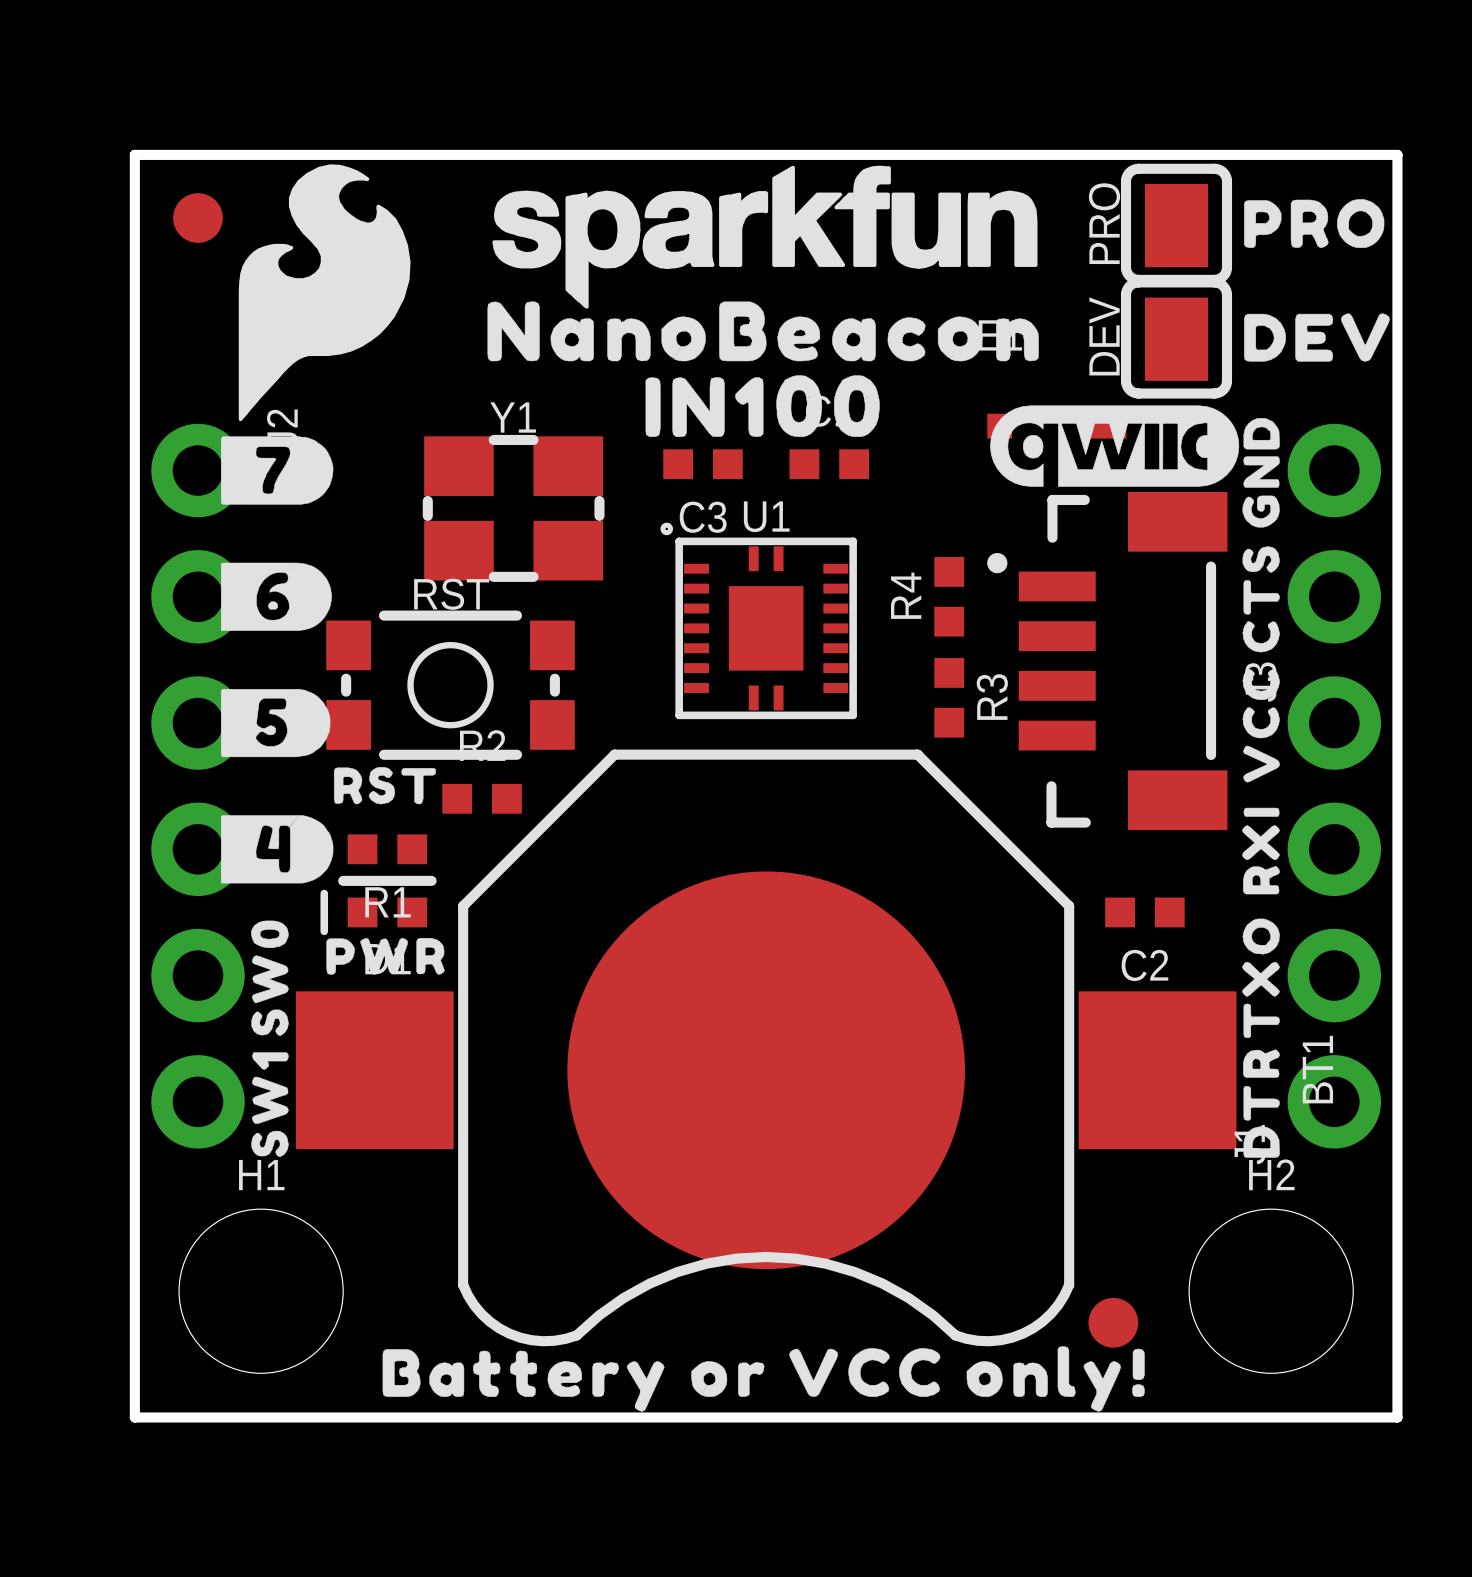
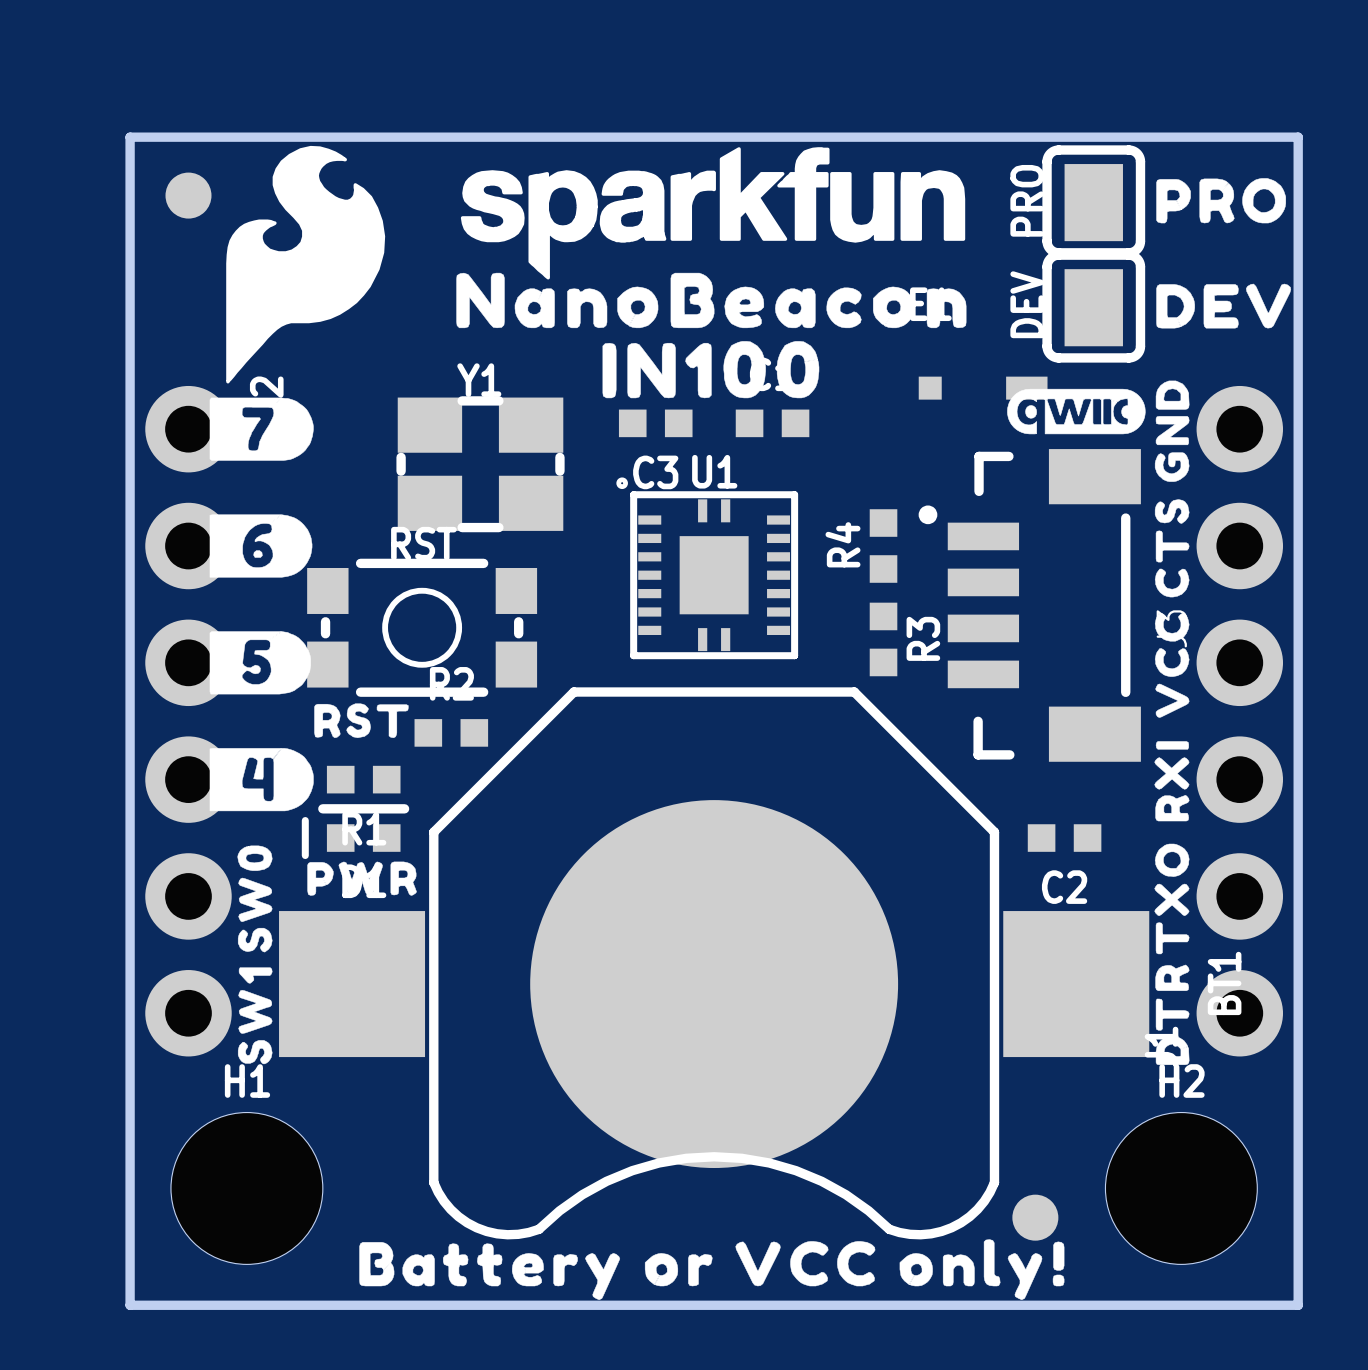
drawing shape: [990, 405, 1240, 487] -> [1007, 388, 1146, 435]

